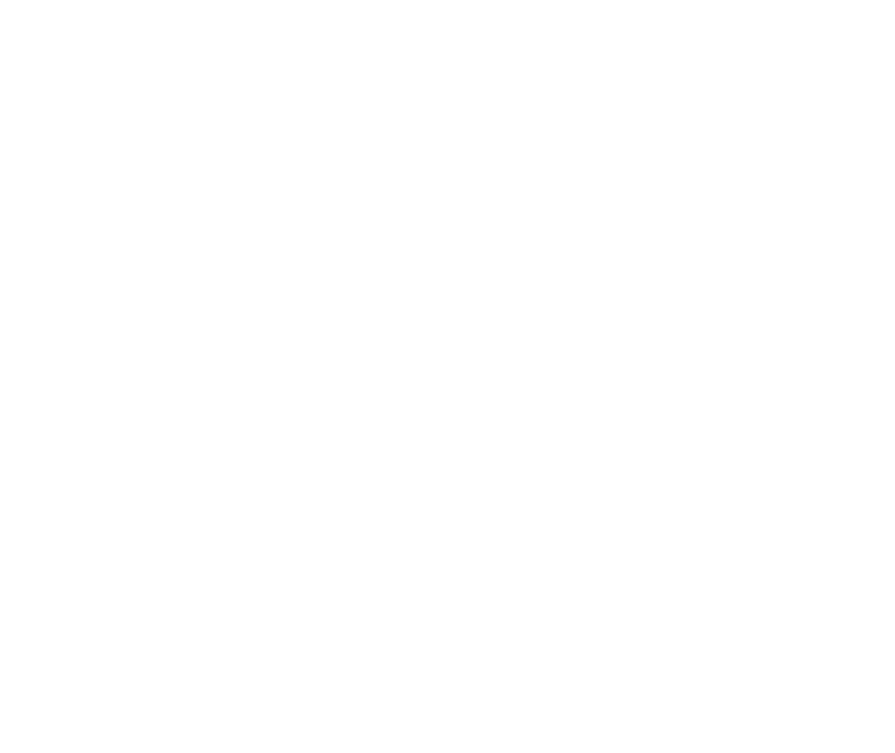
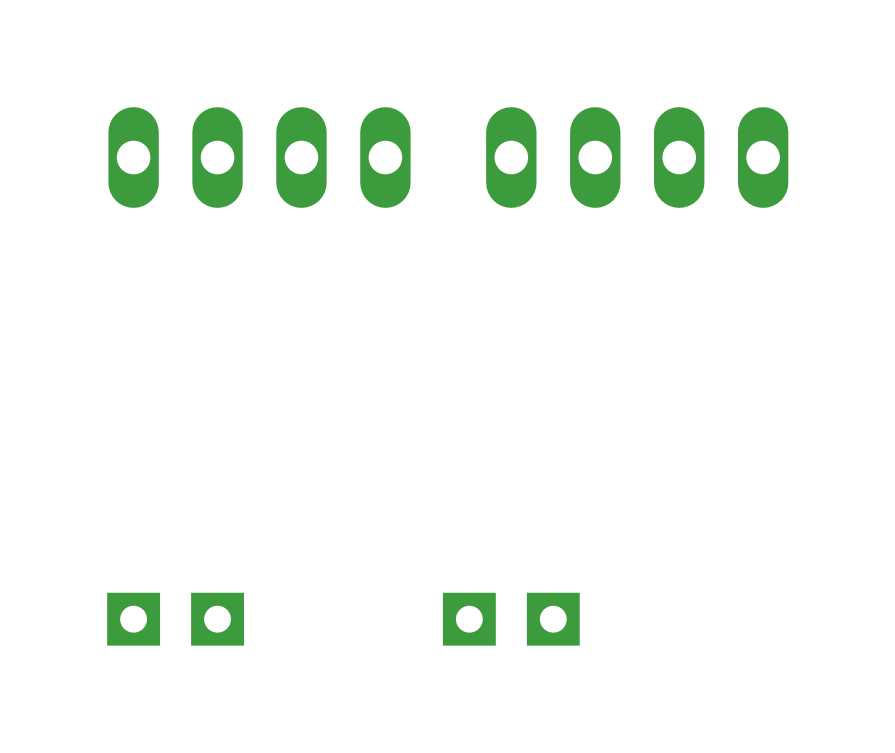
part: none -> (259, 157)
part: none -> (637, 157)
part: none -> (175, 619)
part: none -> (511, 619)

